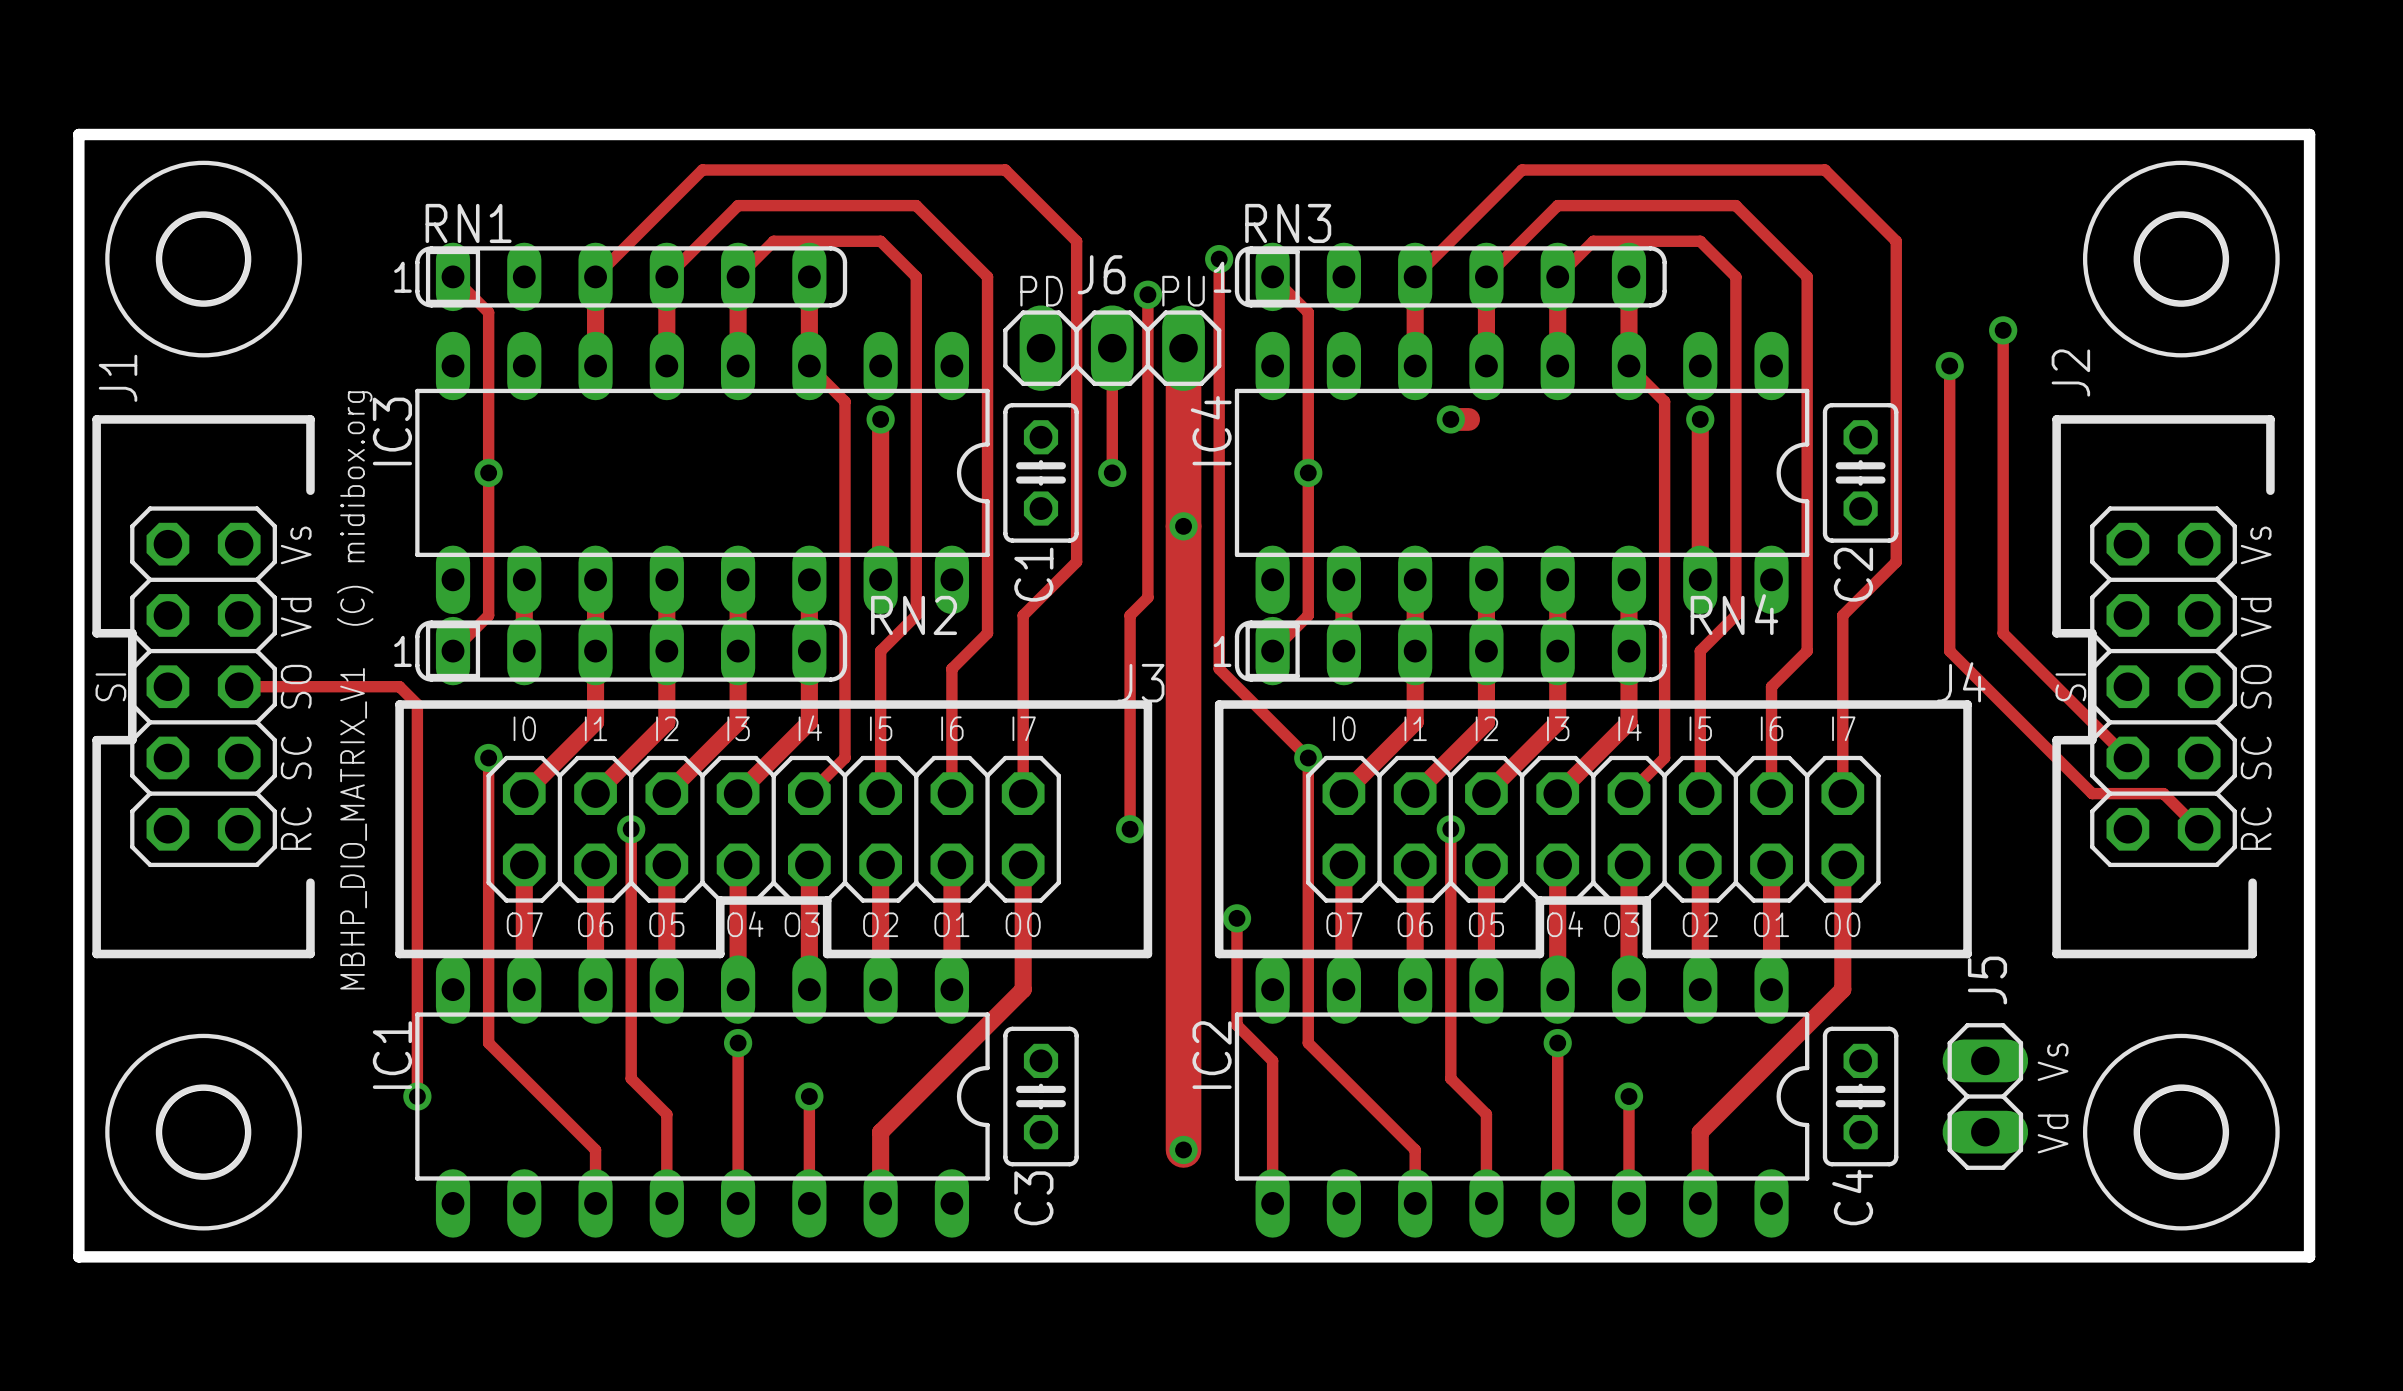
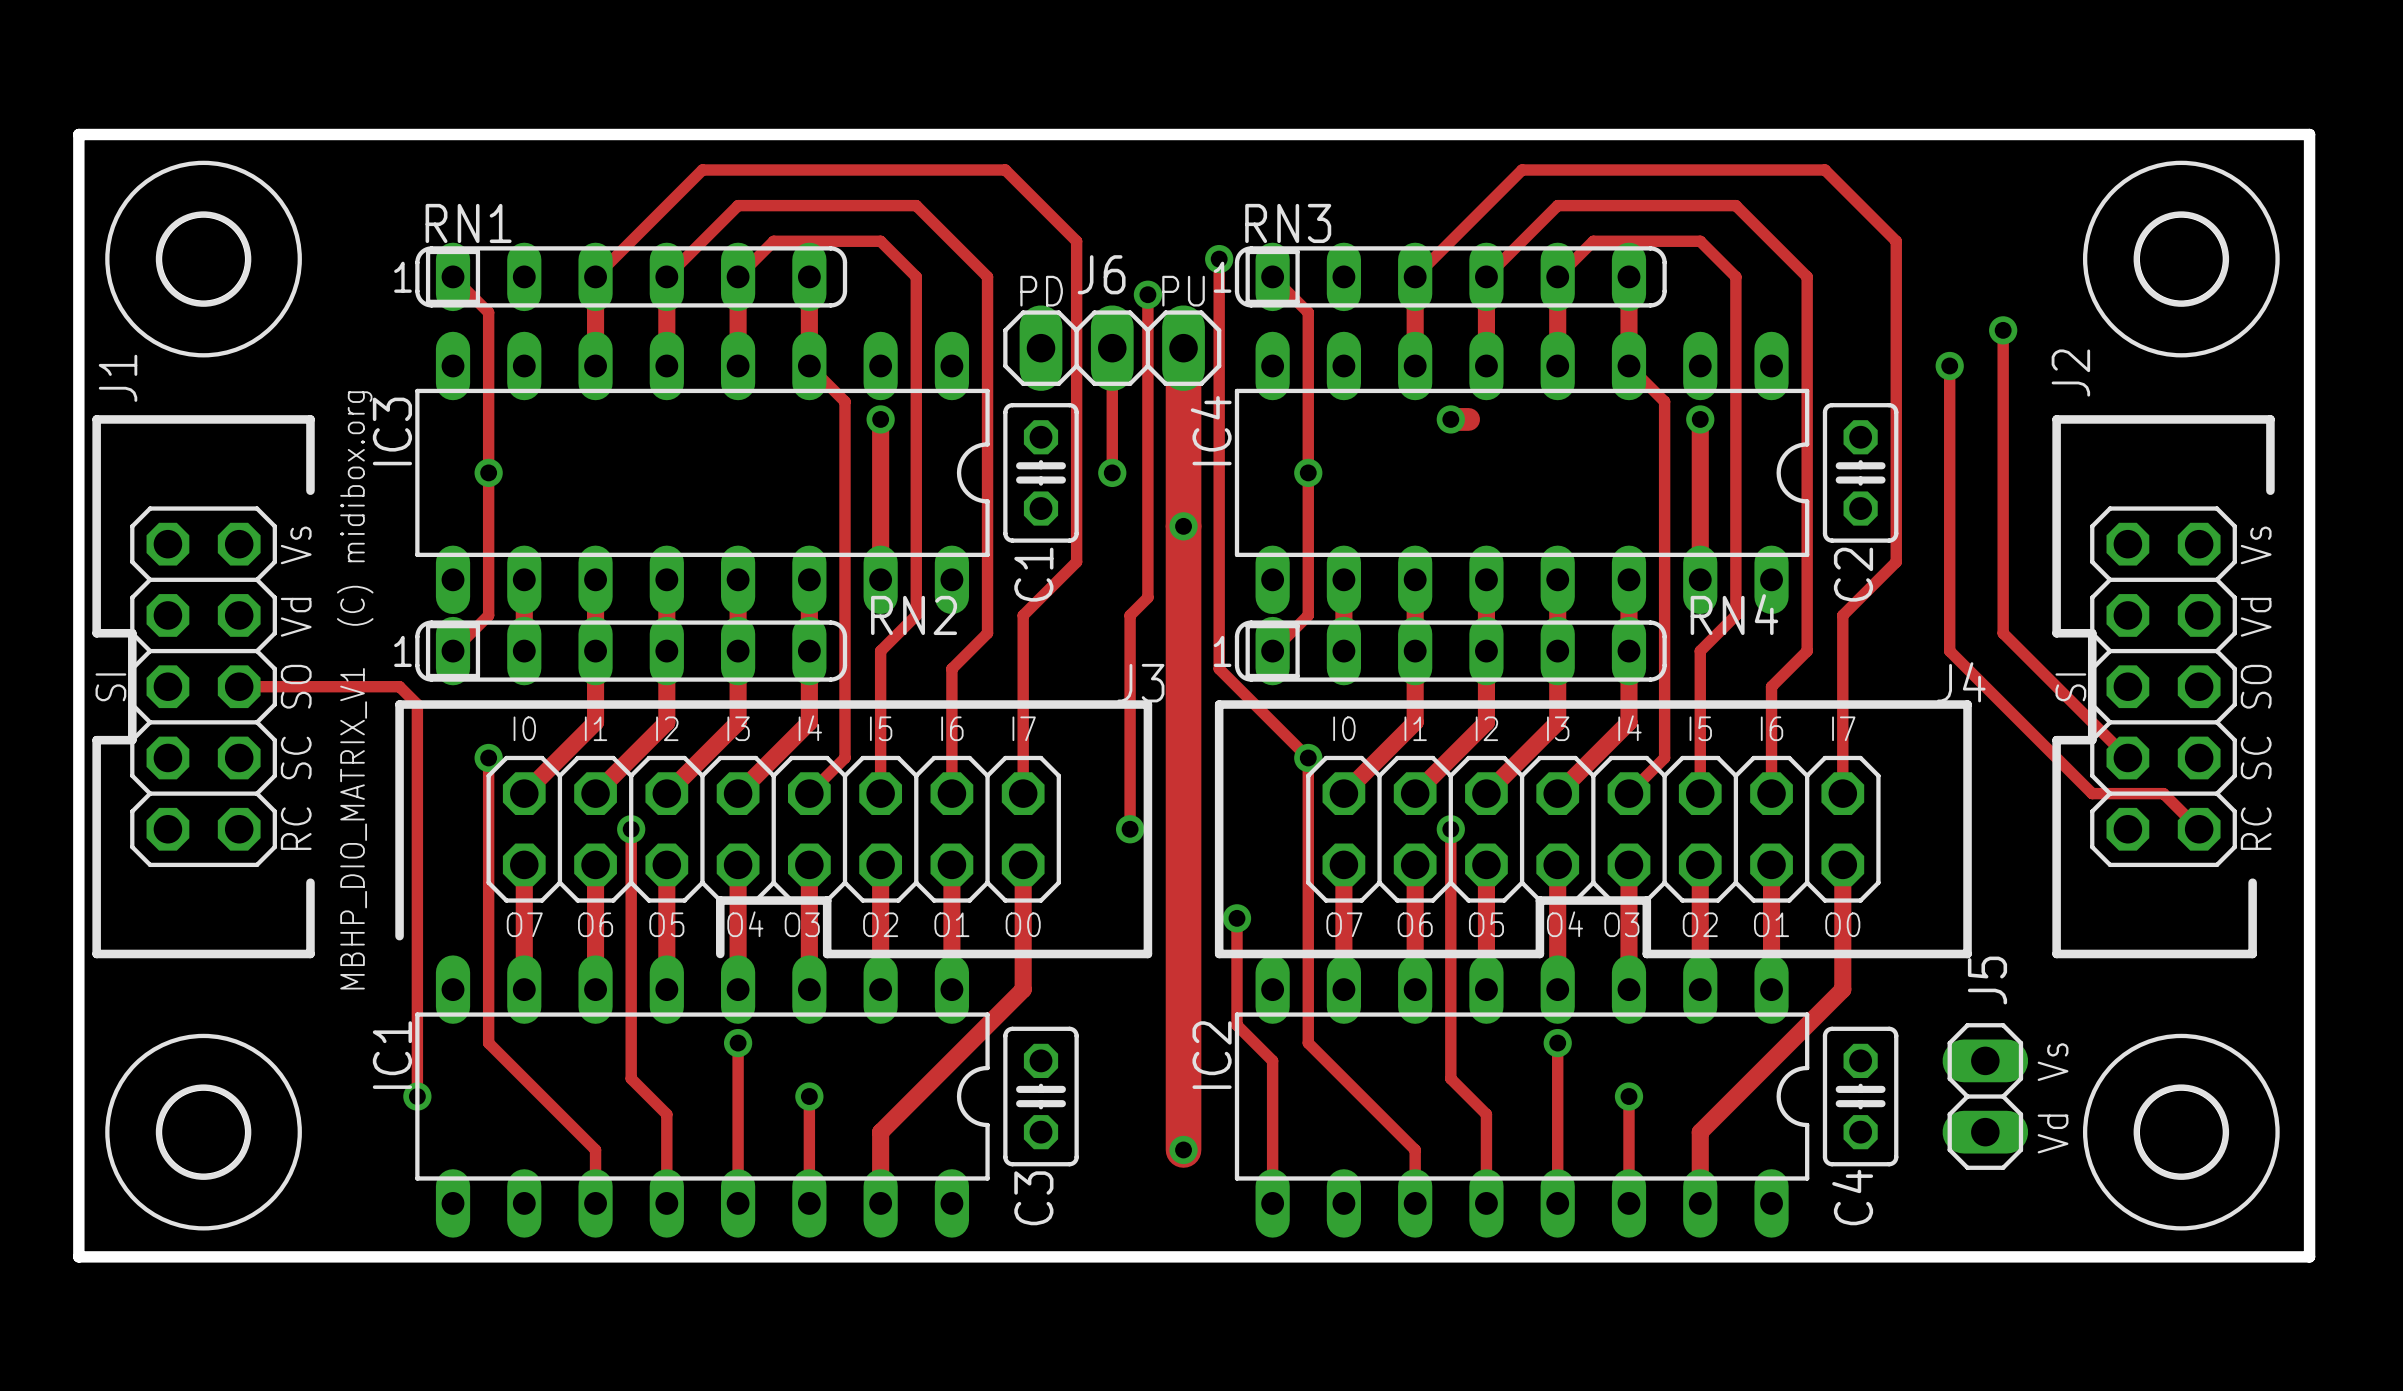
line: (399, 936) (399, 953) (720, 953) -> none

